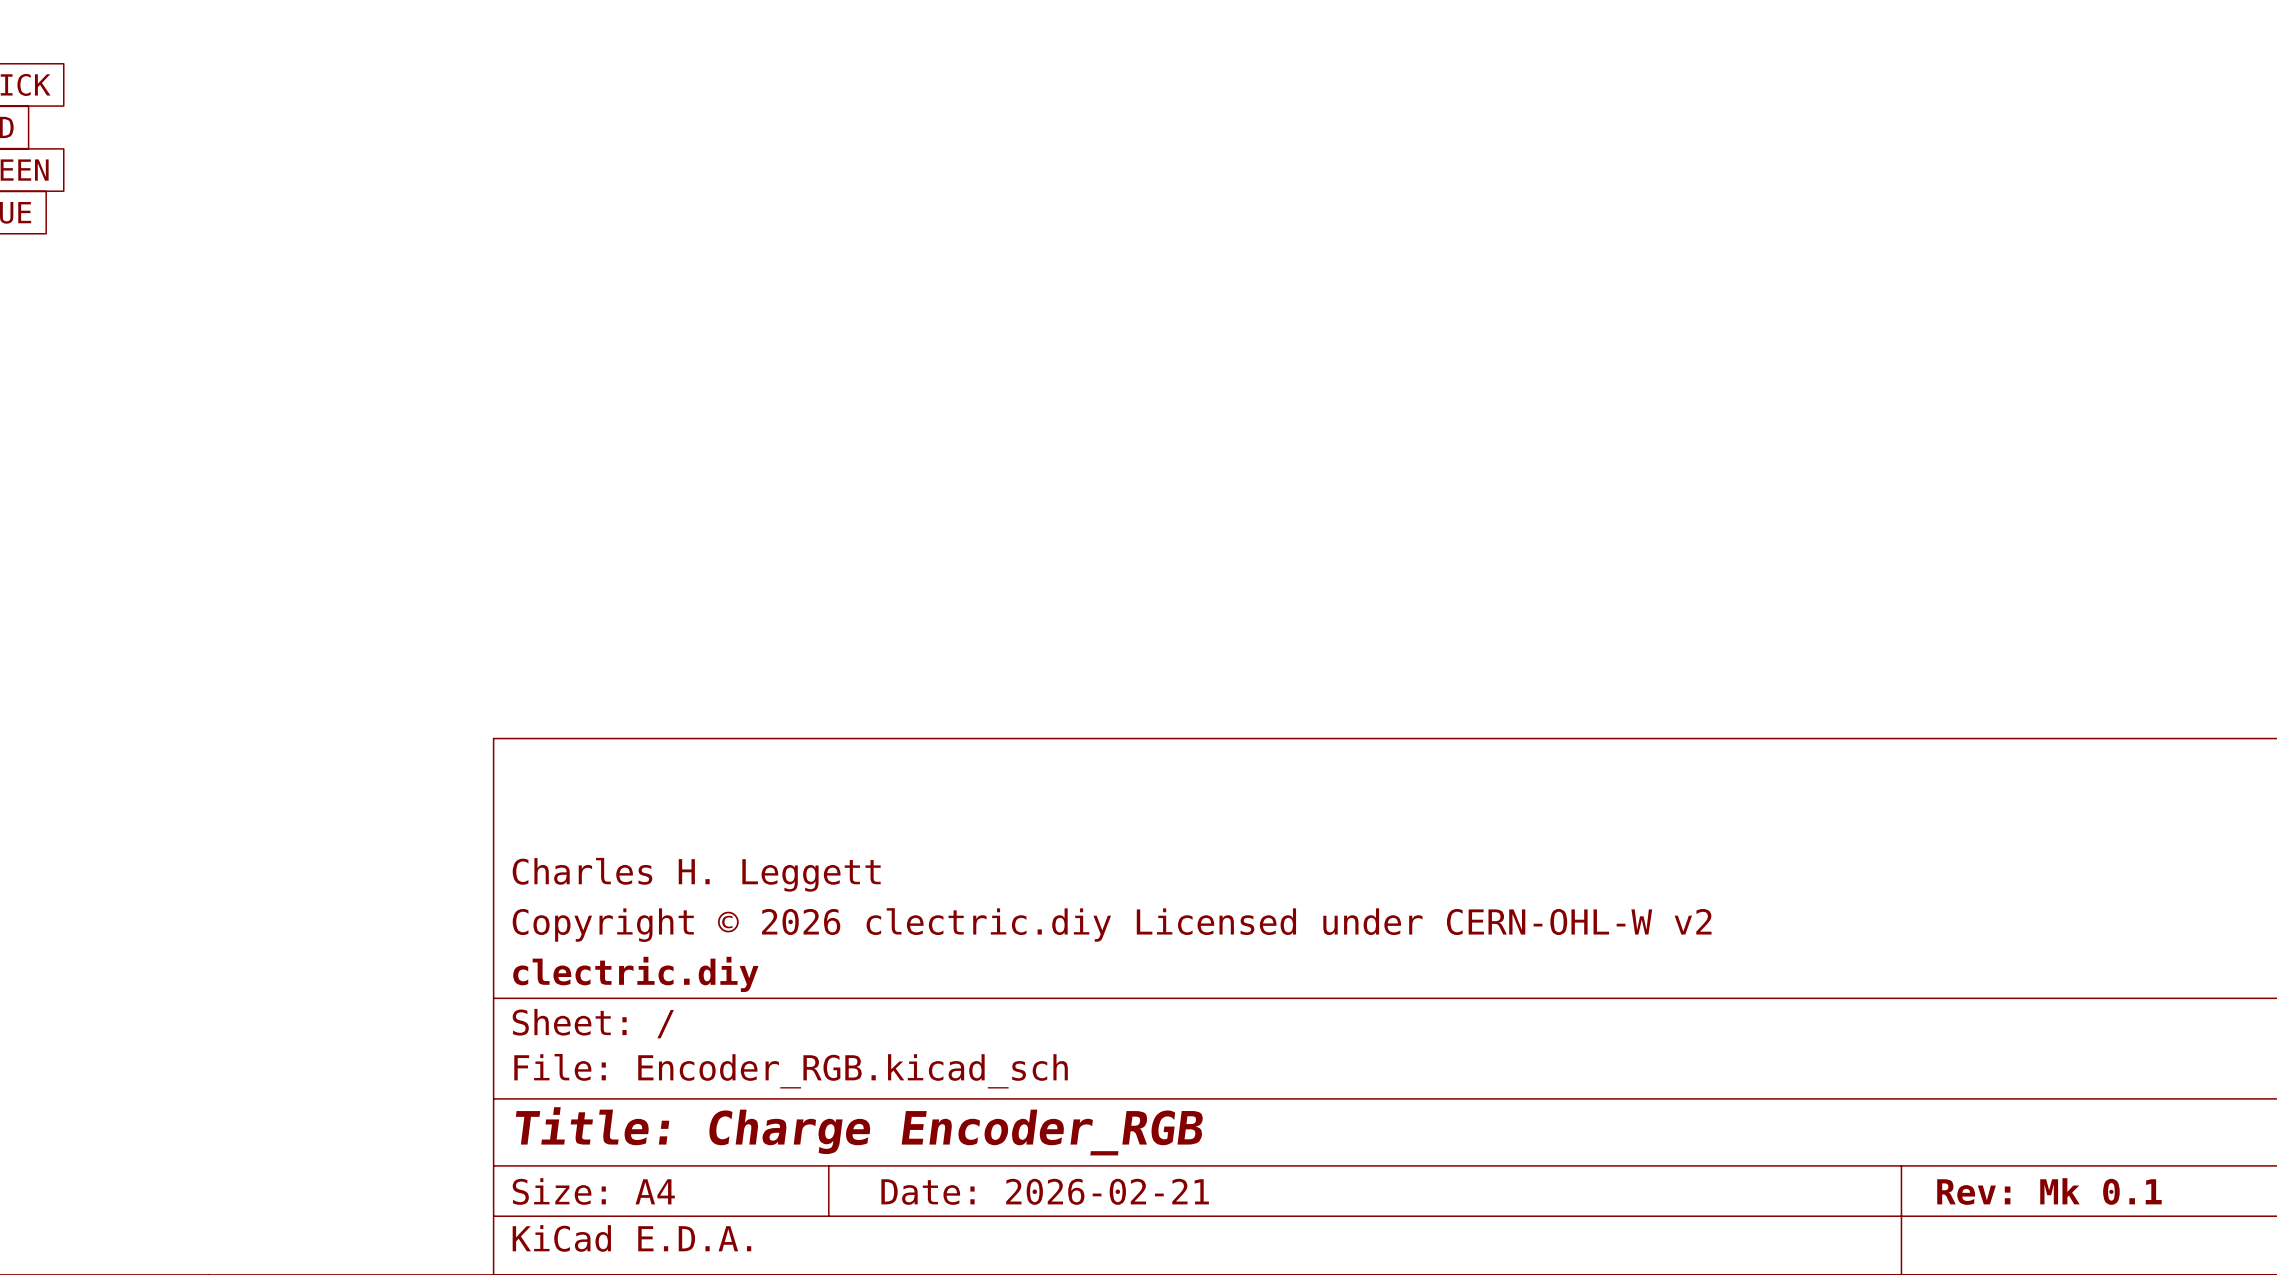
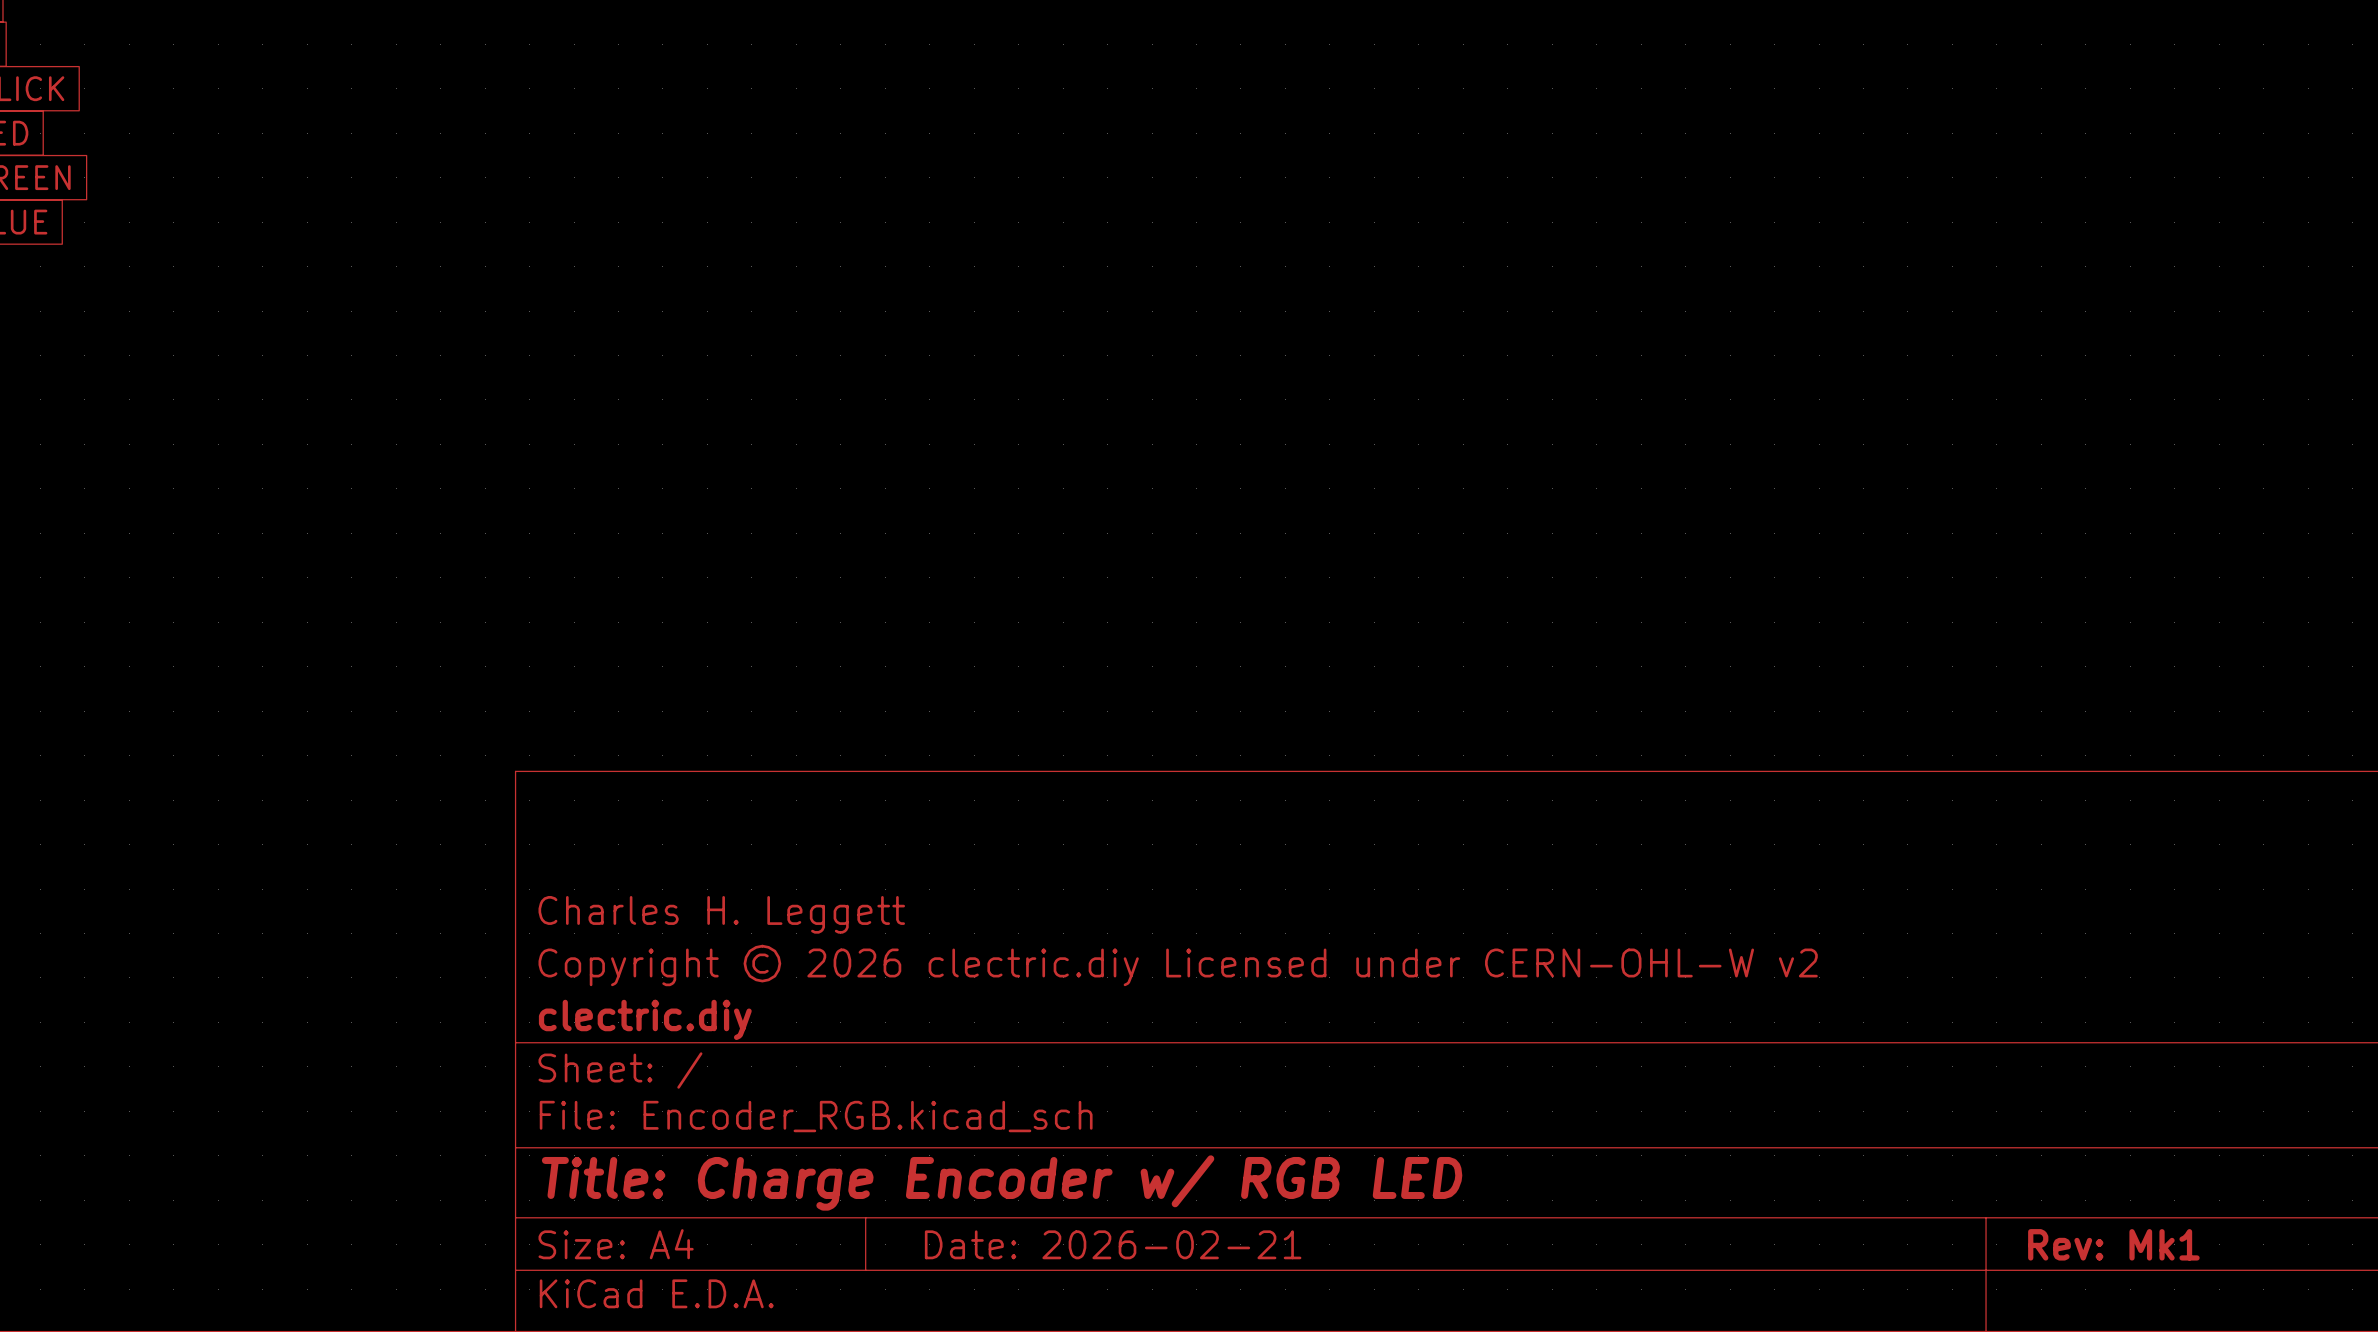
title block: Title: Charge Encoder_RGB (859, 1131) -> Title: Charge Encoder w/ RGB LED (1002, 1182)
title block: Rev: Mk 0.1 (2049, 1191) -> Rev: Mk1 (2113, 1244)

